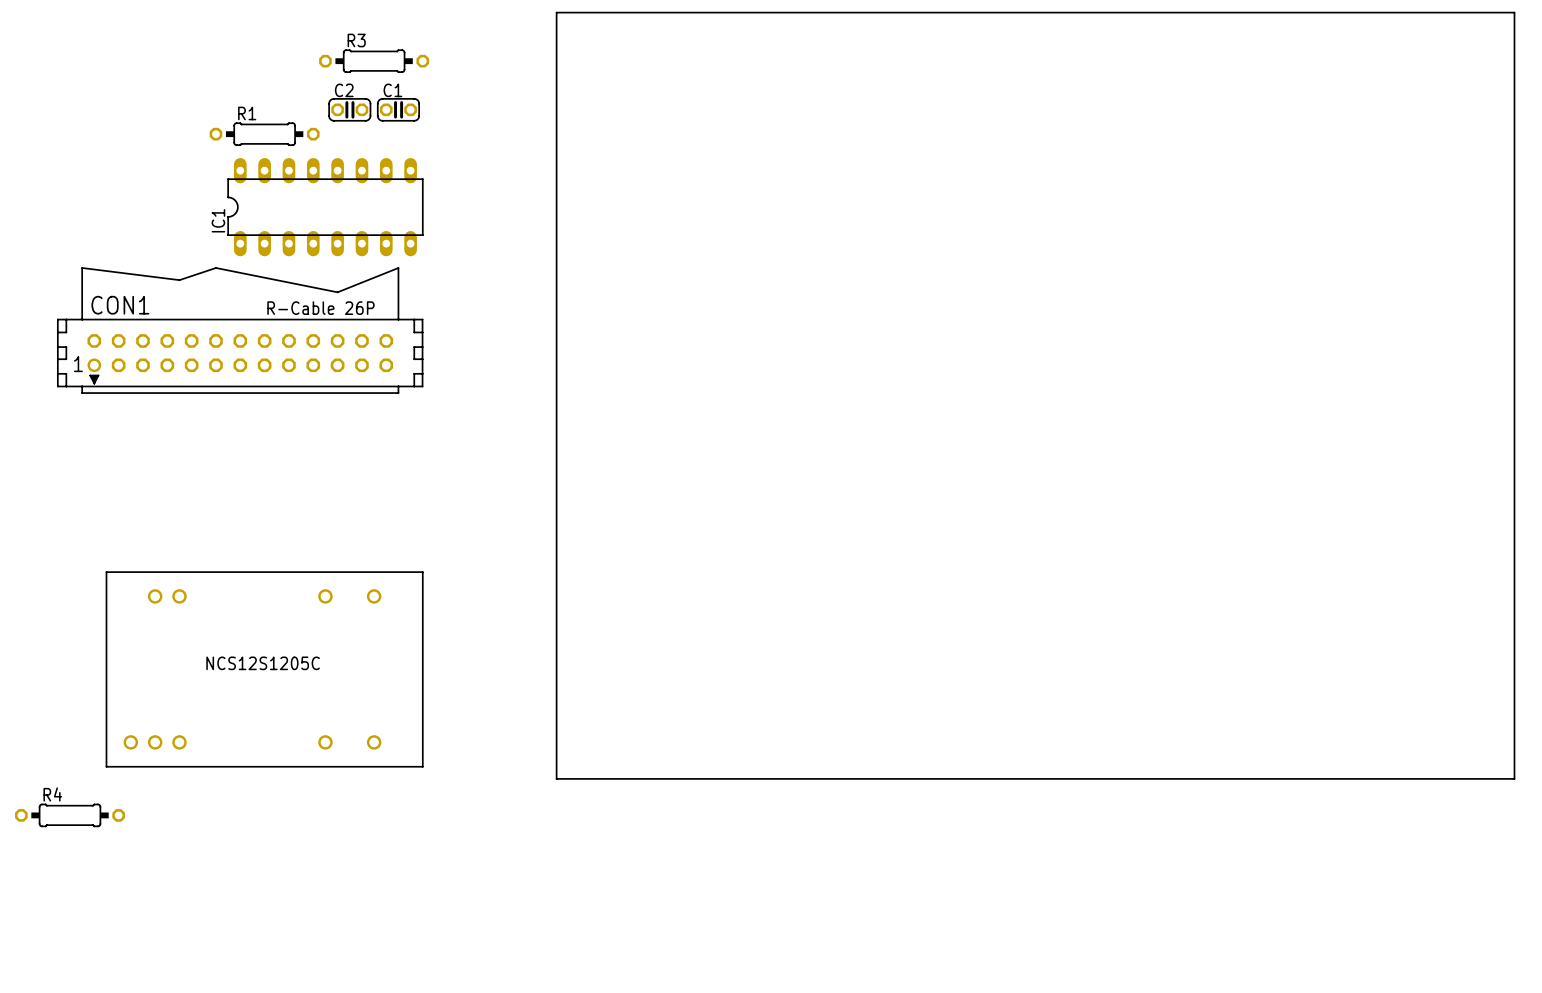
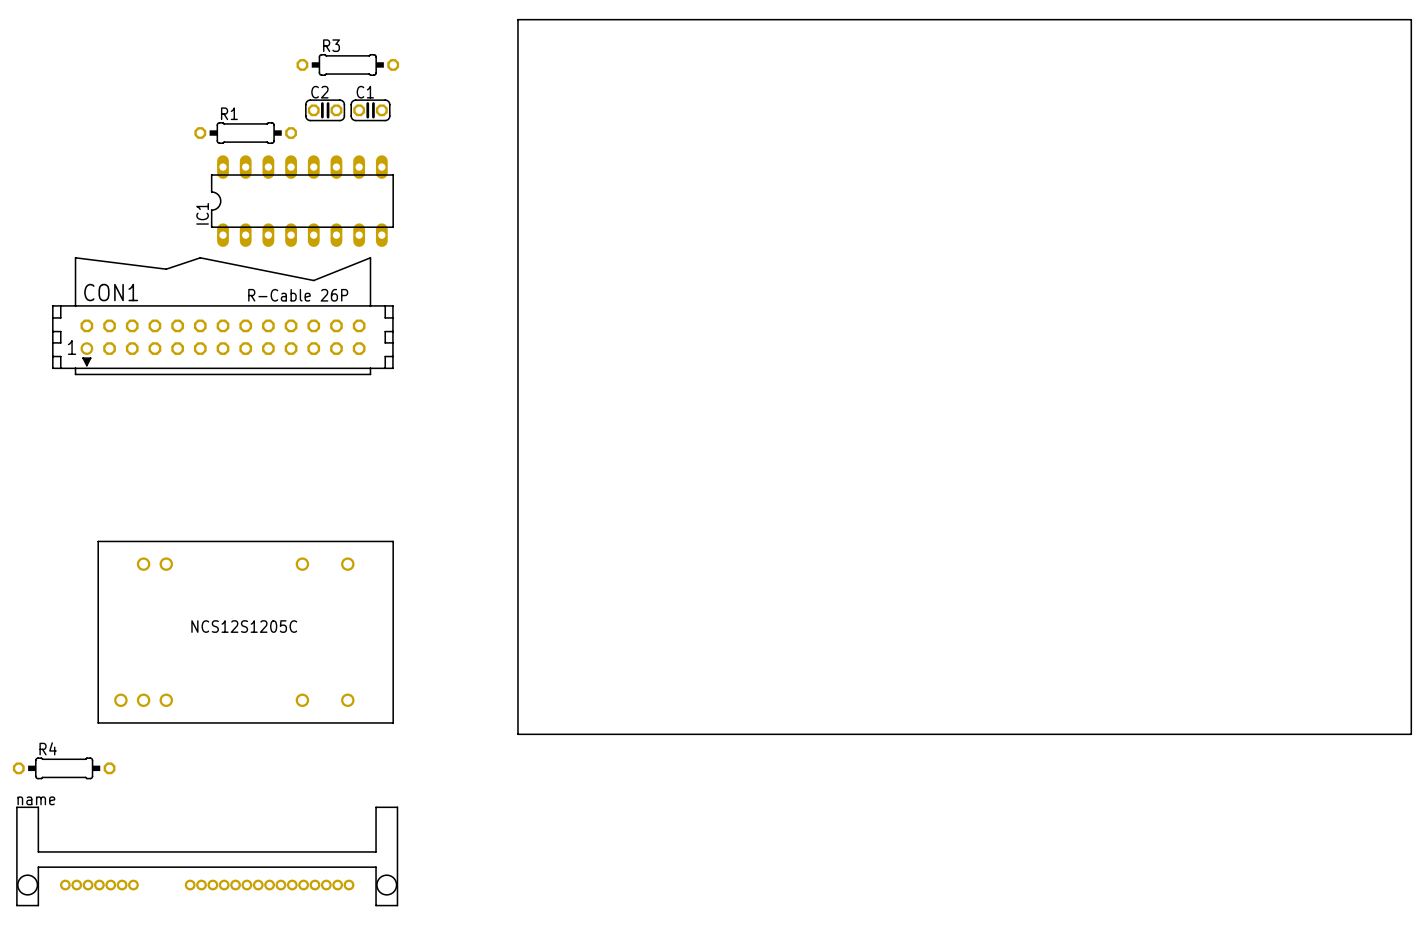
part: none -> (207, 856)

